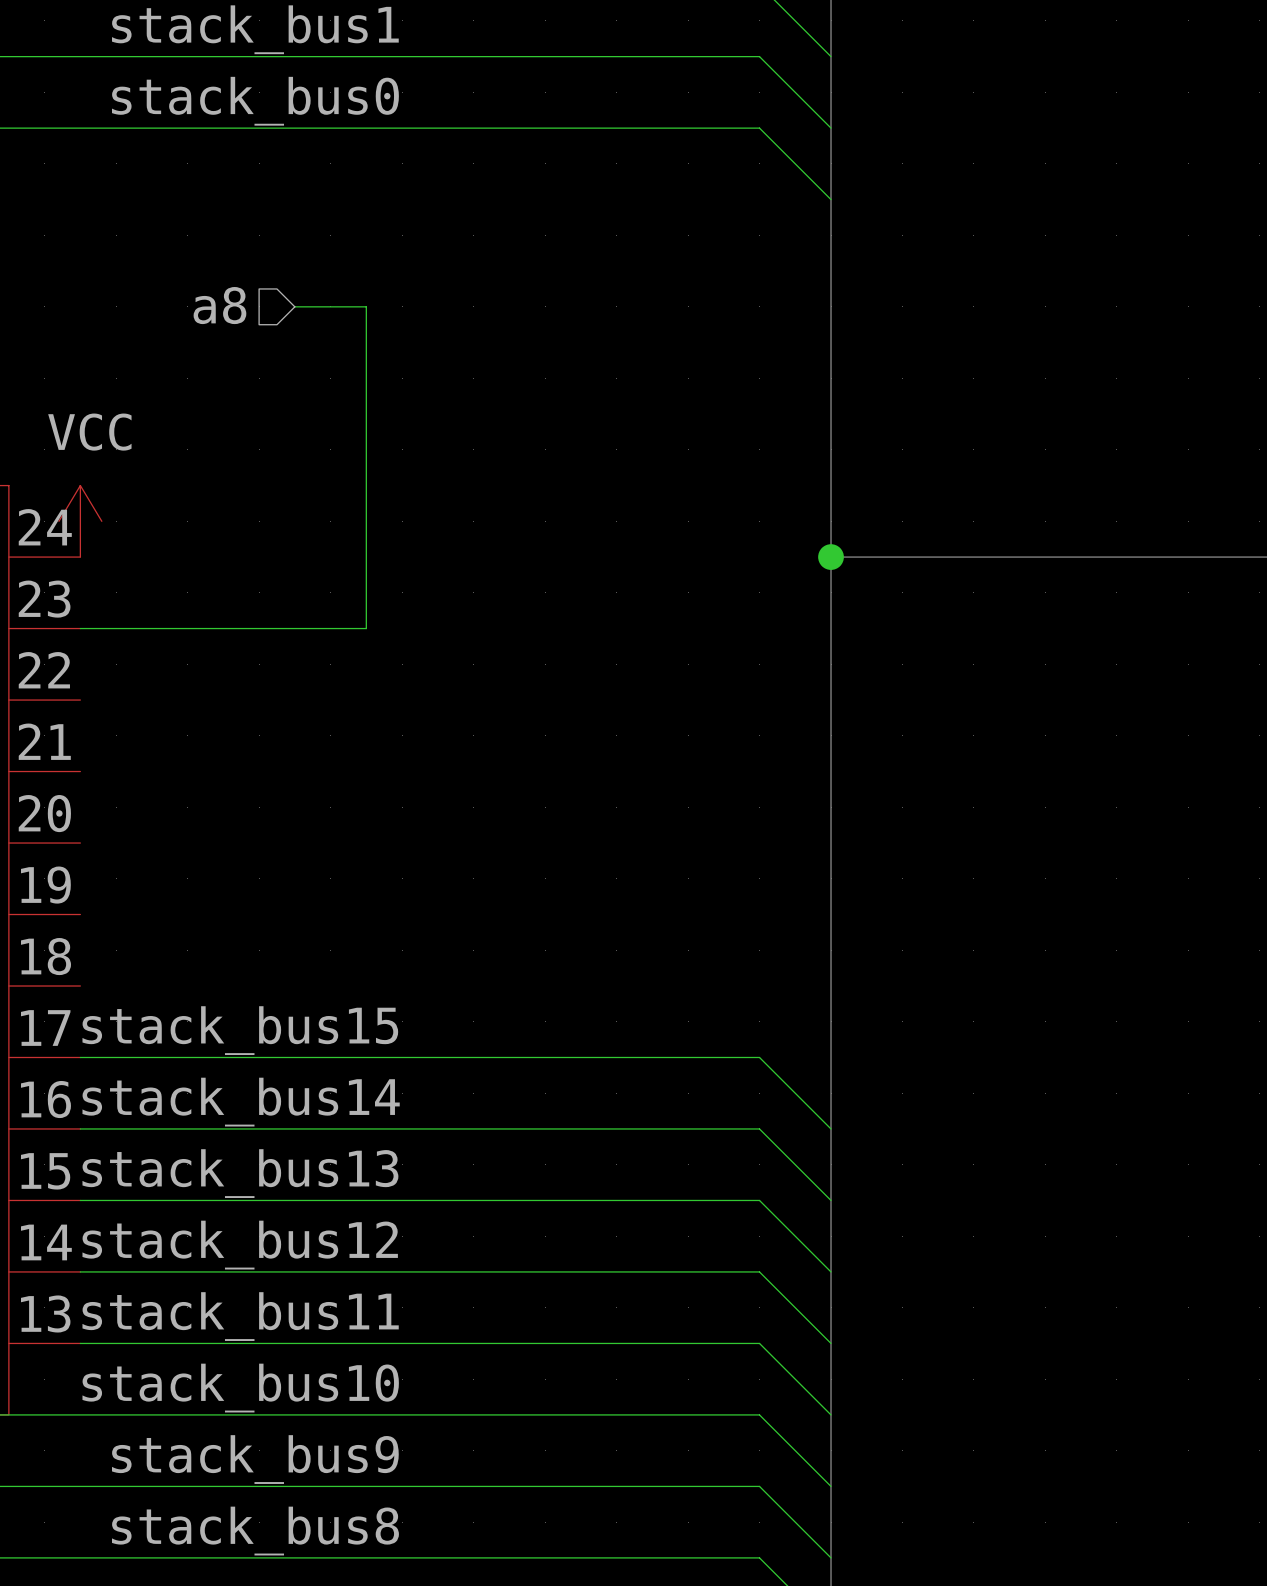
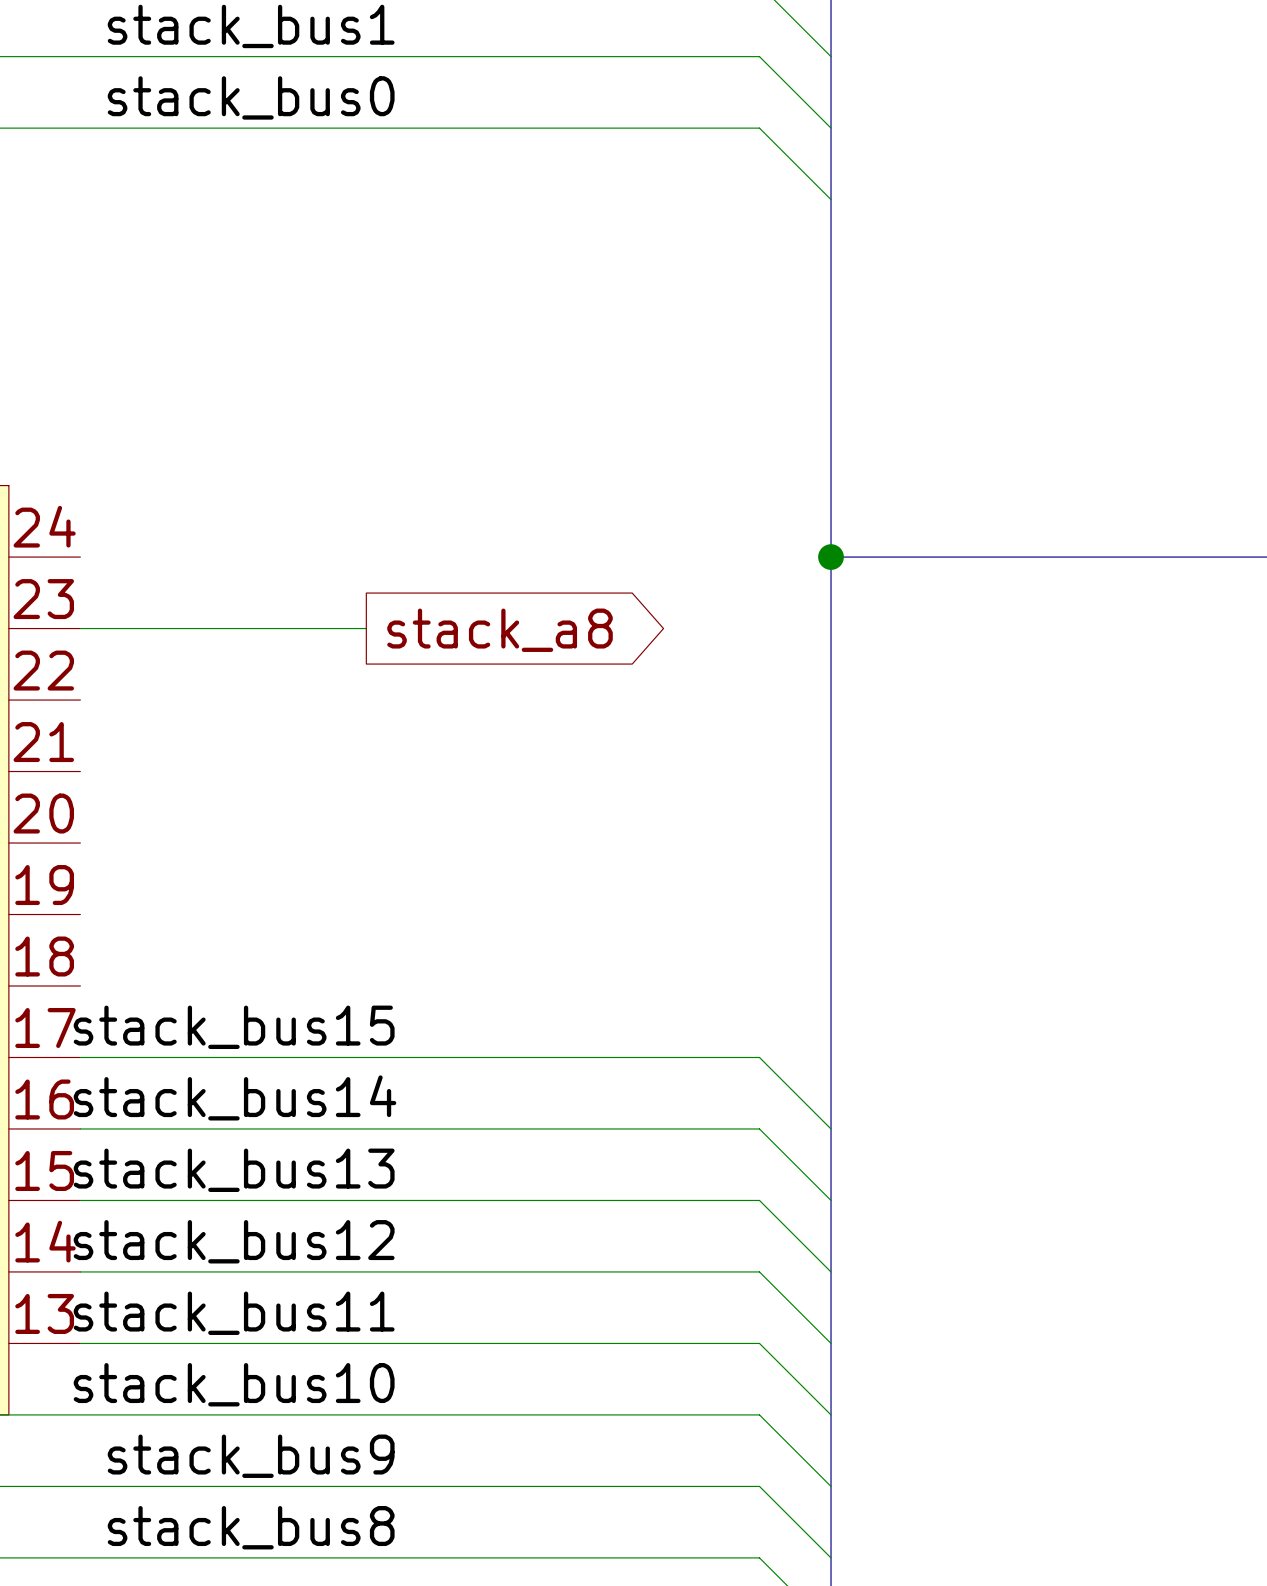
hierarchical label: a8 (219, 305) -> none
wire: (294, 306) (366, 306) (366, 628) -> none
power symbol: VCC (80, 521) -> none
global label: none -> stack_a8 (500, 630)

